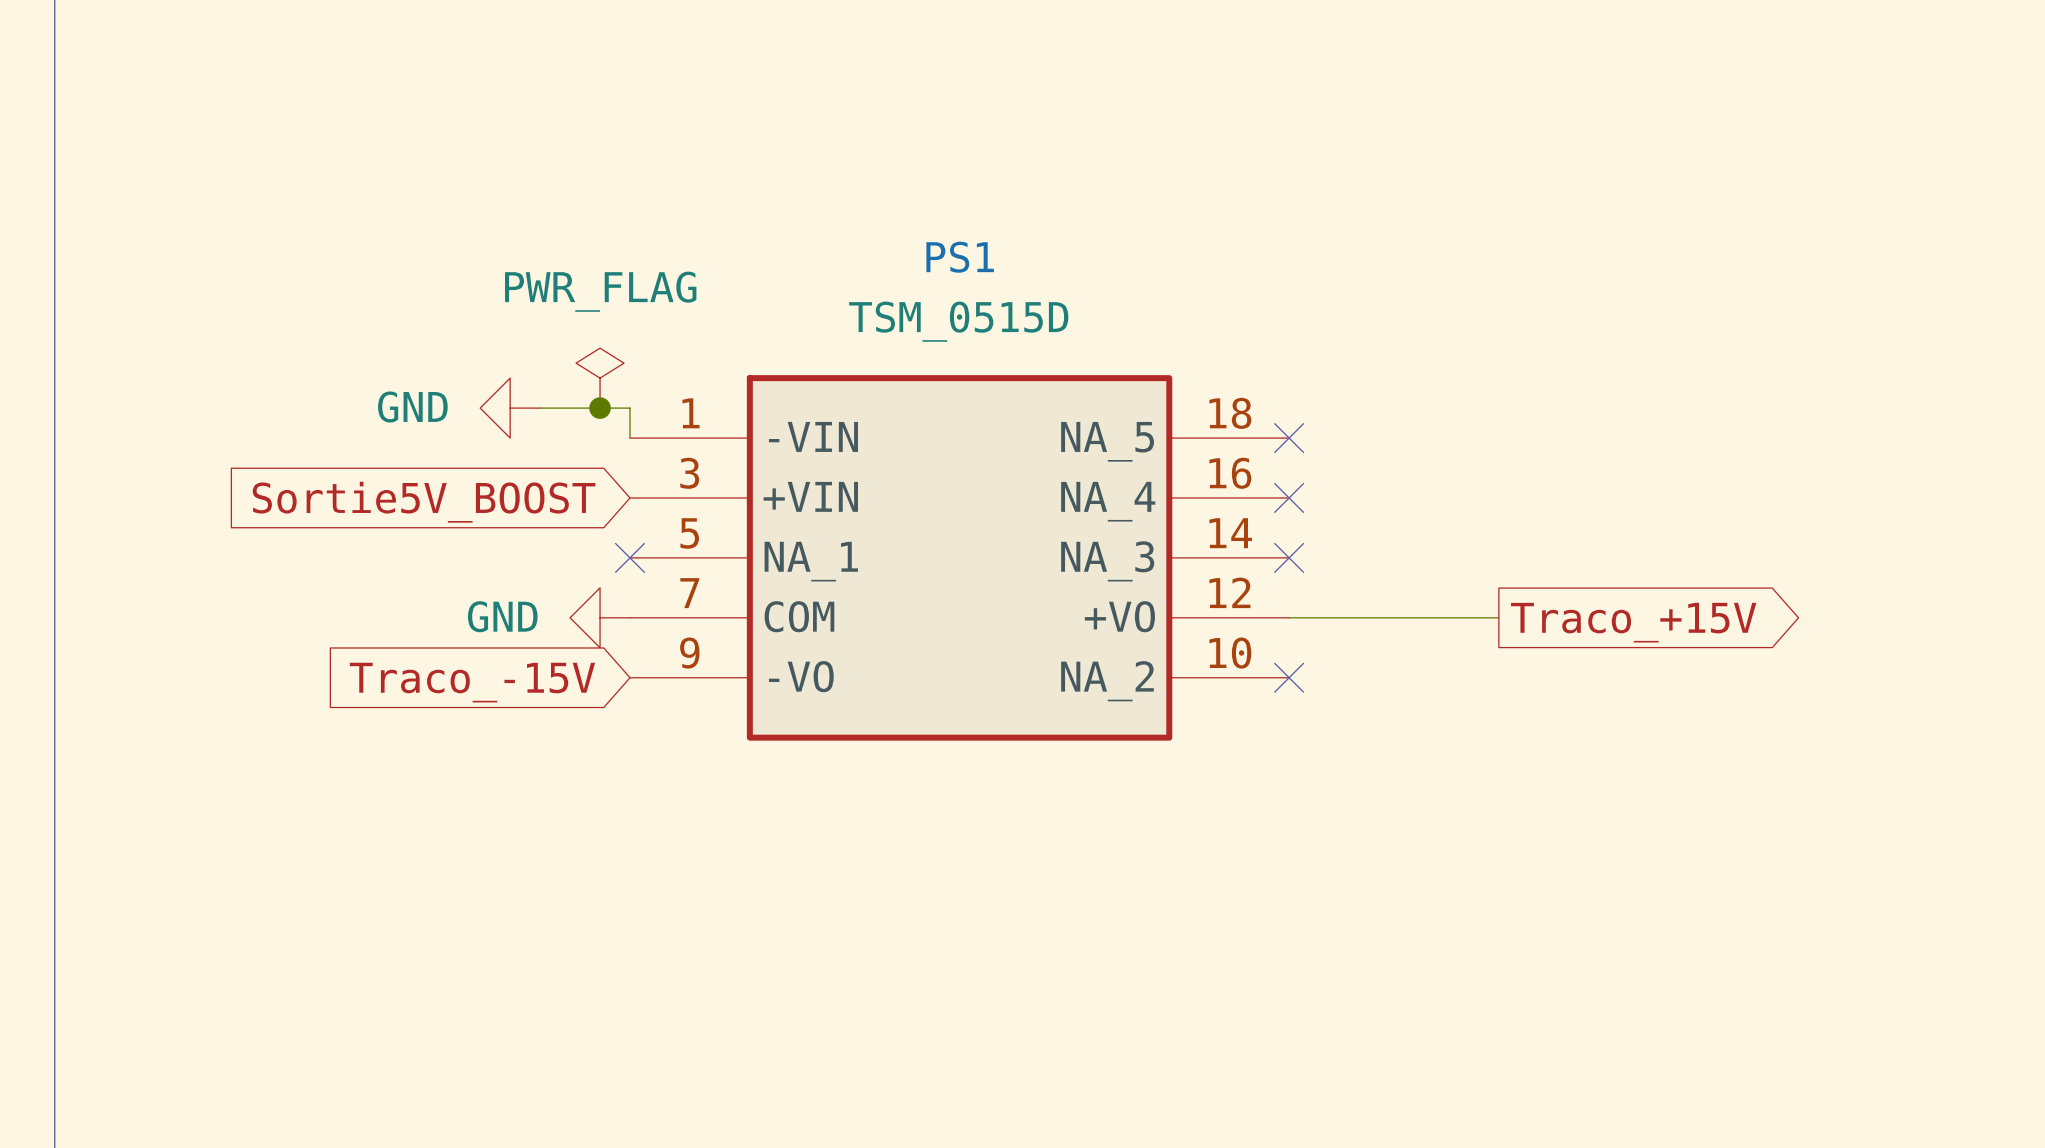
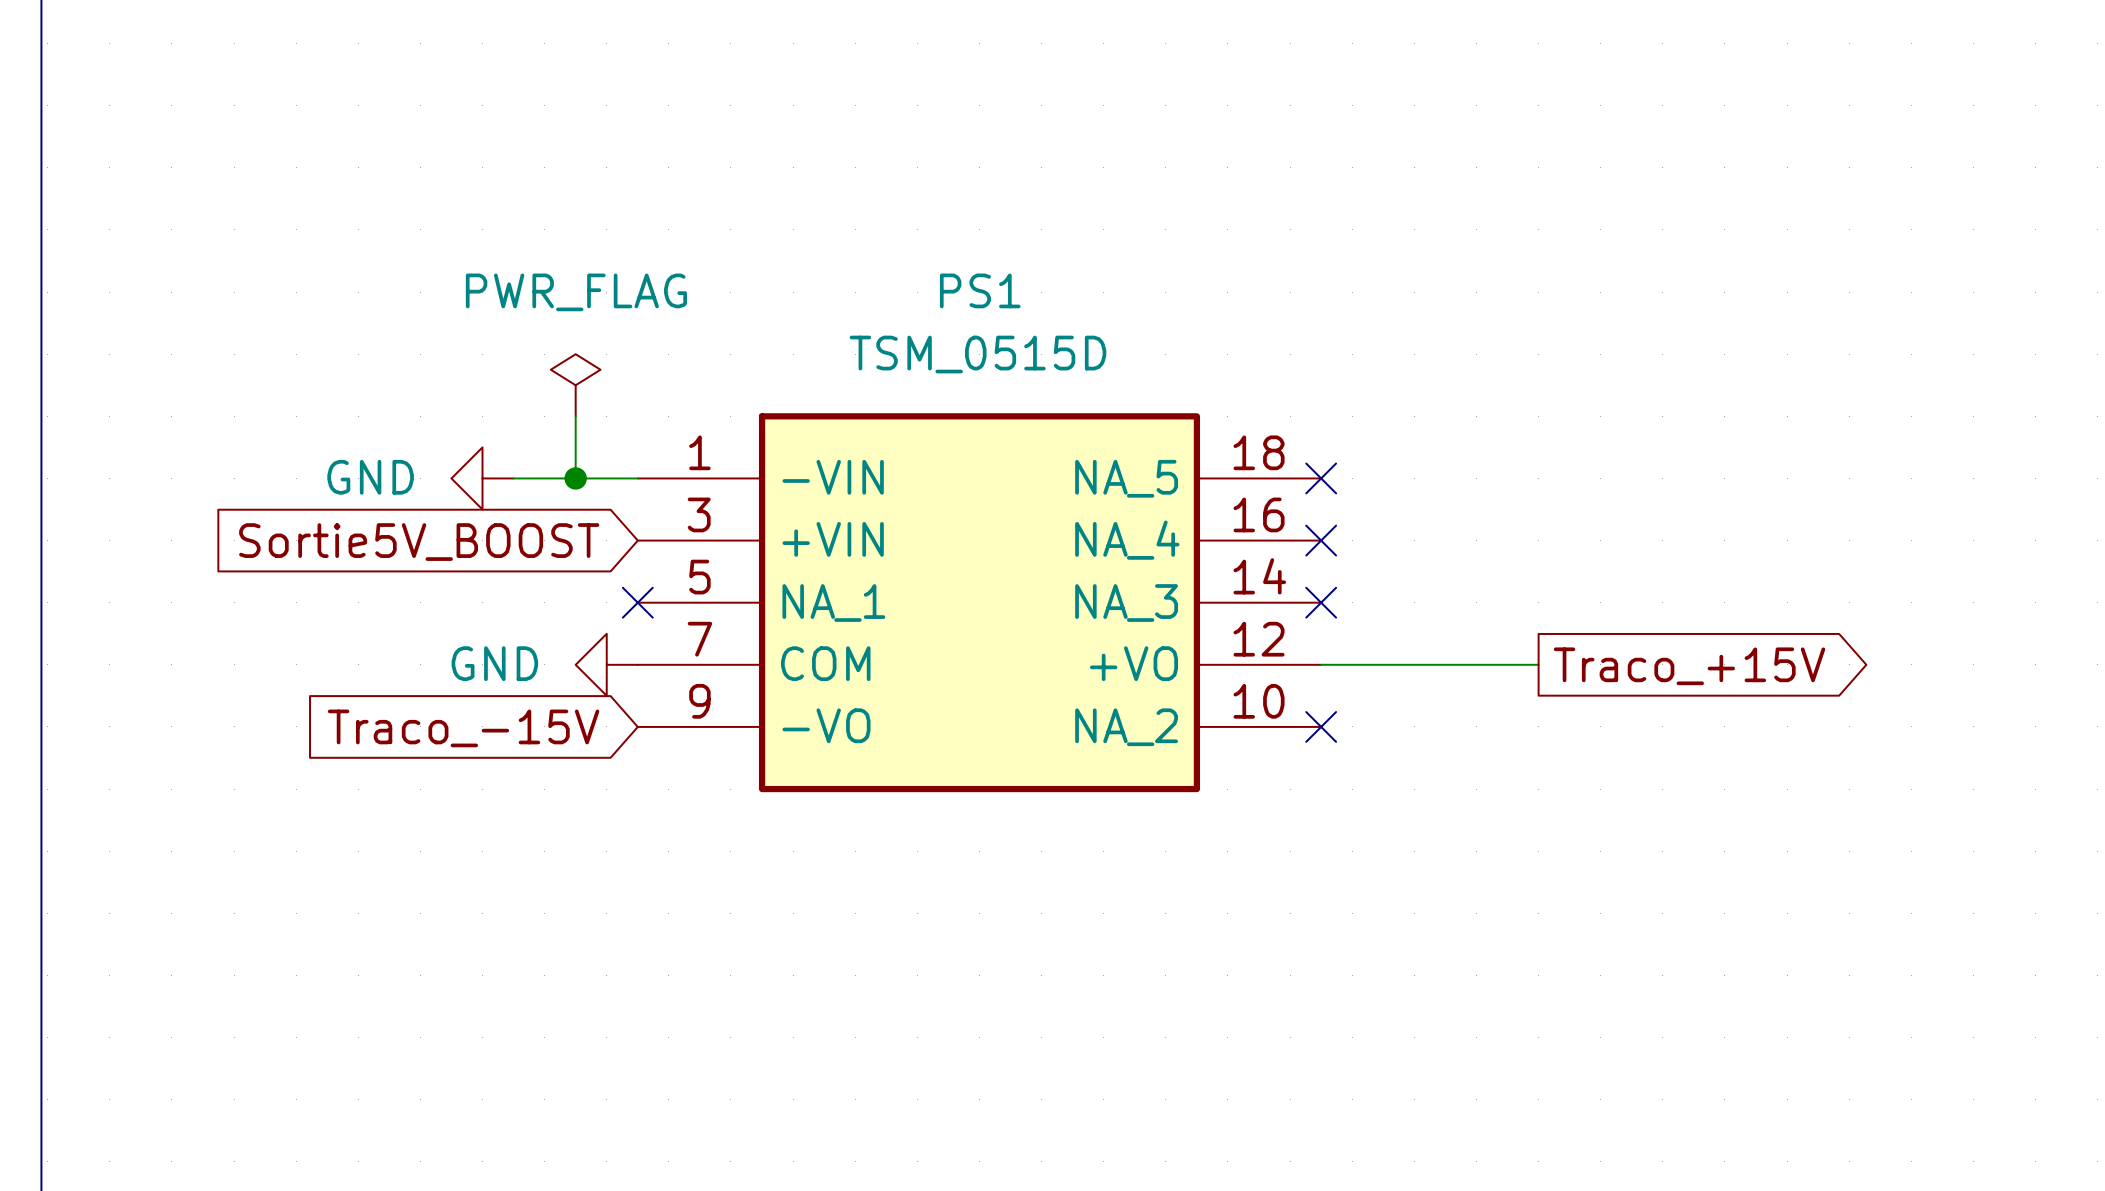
wire: none -> (575, 416) (575, 478)
power symbol position: PWR_FLAG (600, 378) -> PWR_FLAG (575, 385)
power symbol position: GND (510, 408) -> GND (482, 478)
wire: (540, 408) (630, 408) (630, 438) -> (513, 478) (637, 478)
junction position: (600, 408) -> (575, 478)

